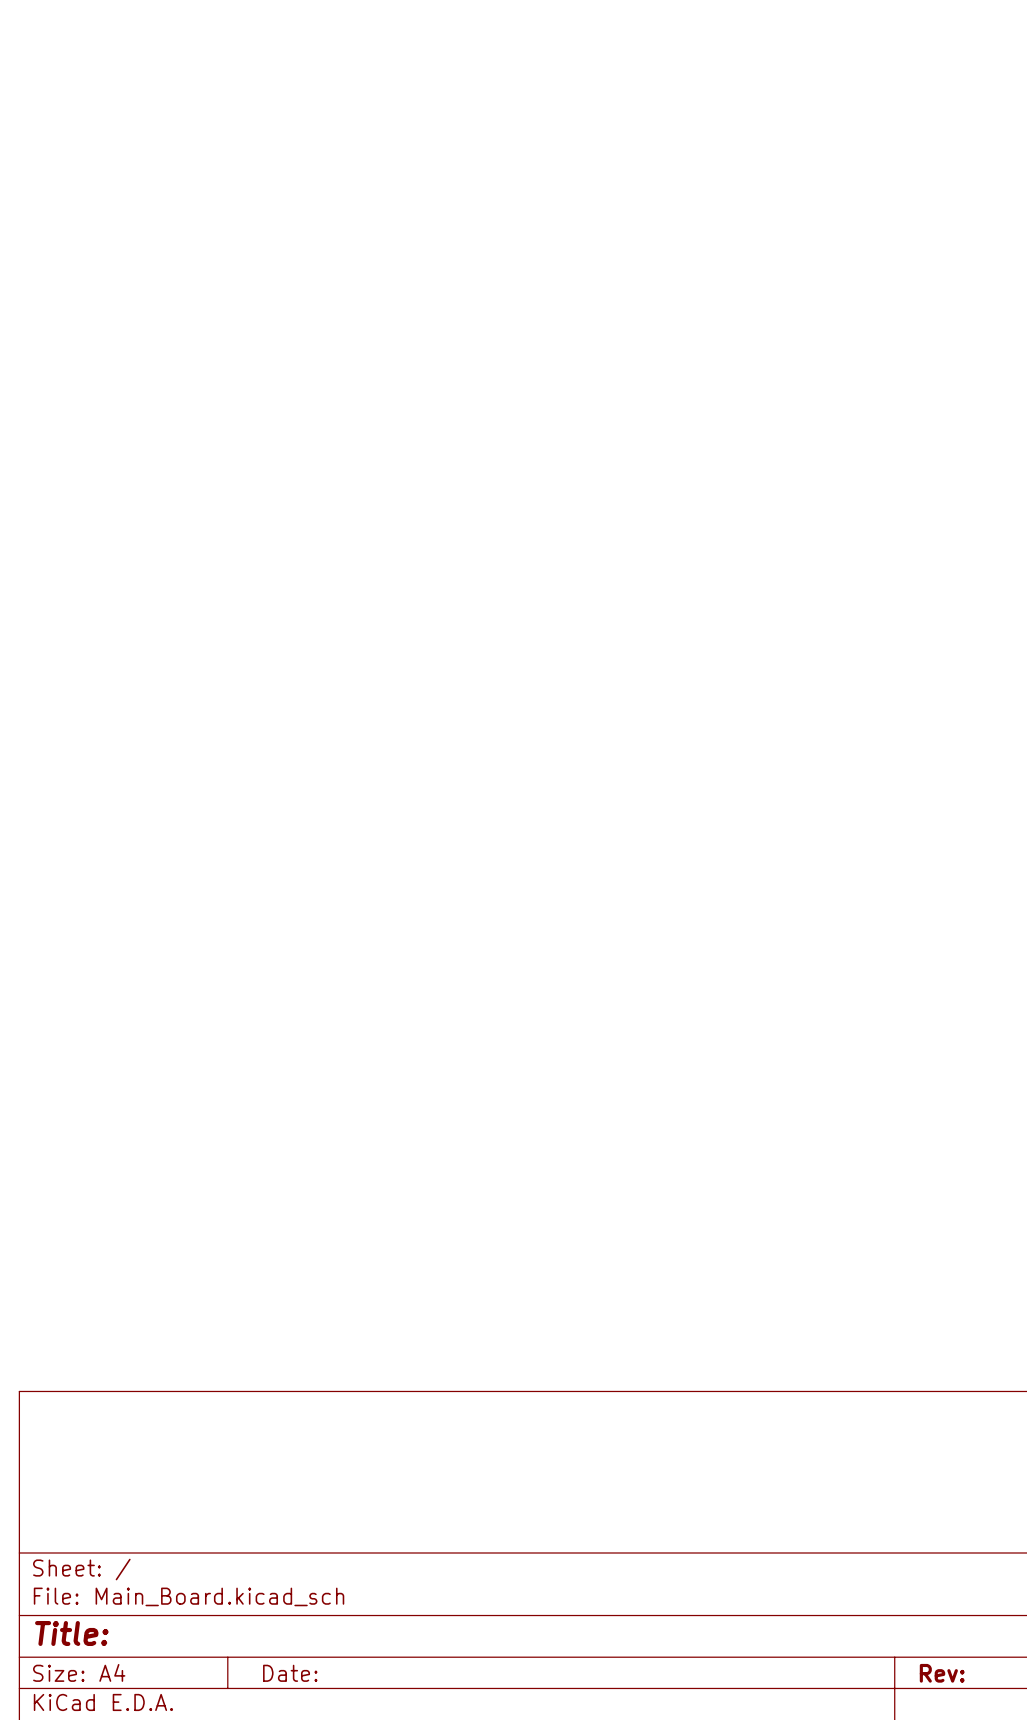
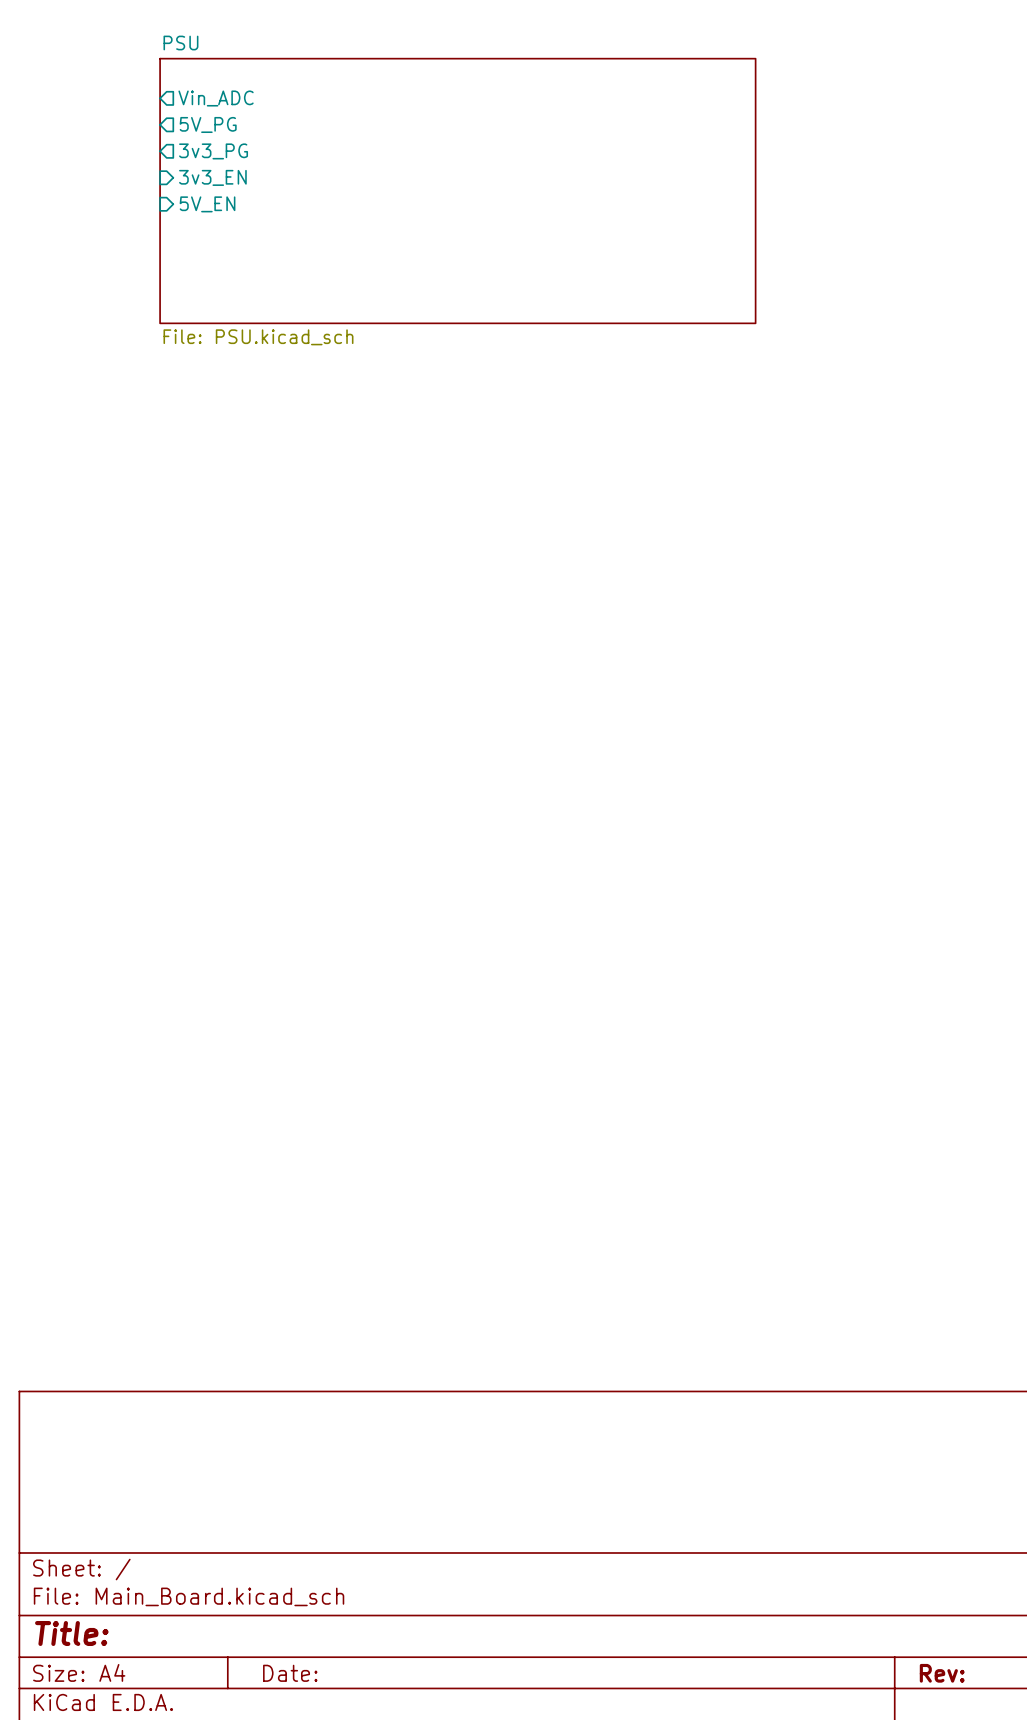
sheet pin: none -> Vin_ADC (216, 98)
sheet pin: none -> 5V_PG (208, 124)
sheet pin: none -> 3v3_PG (213, 151)
sheet pin: none -> 3v3_EN (212, 177)
sheet PSU: none -> File: PSU.kicad_sch (457, 191)
sheet pin: none -> 5V_EN (207, 204)

